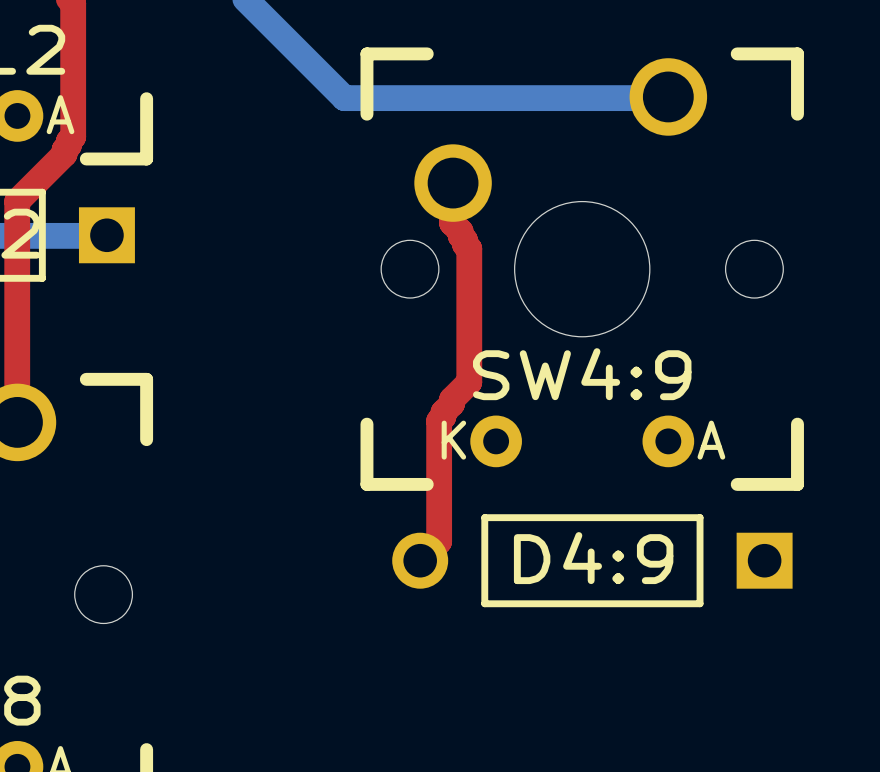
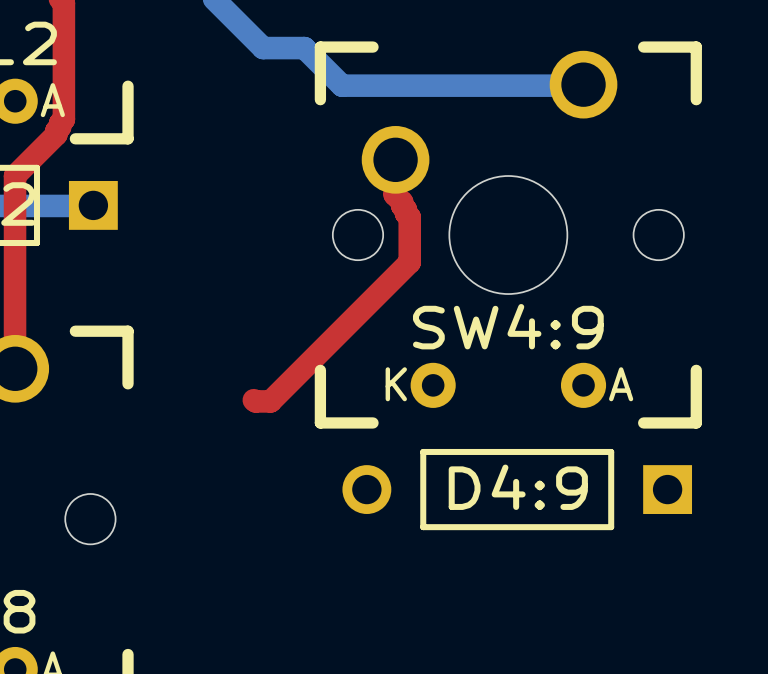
bottom track: (301, 55) (344, 98) (391, 98) -> (263, 48) (304, 48) (342, 85)
top track: (469, 300) (469, 382) (452, 399) (452, 403) (443, 412) (443, 416) (439, 421) (439, 541) (420, 560) -> (409, 262) (270, 401) (253, 400)

